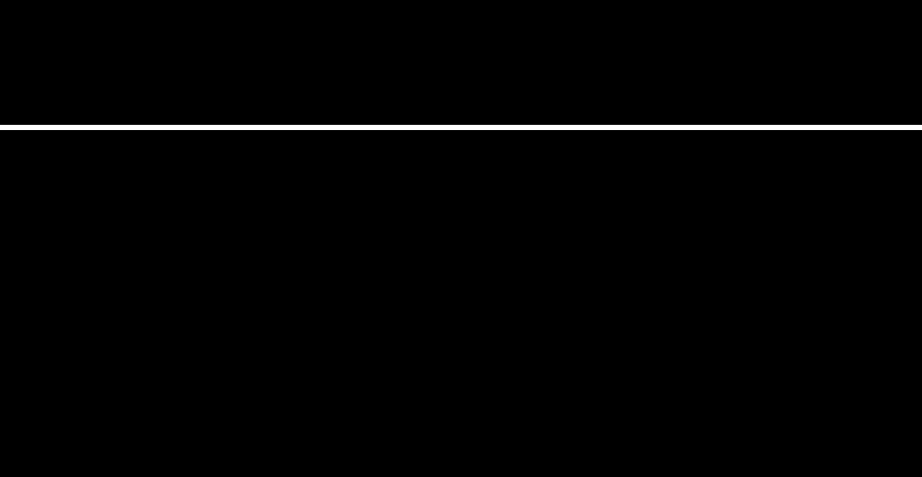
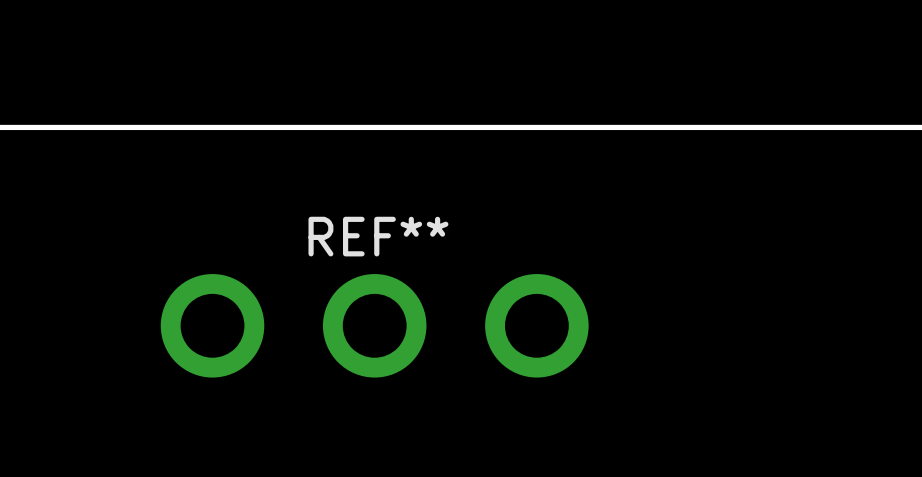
REF**: none -> (374, 325)

